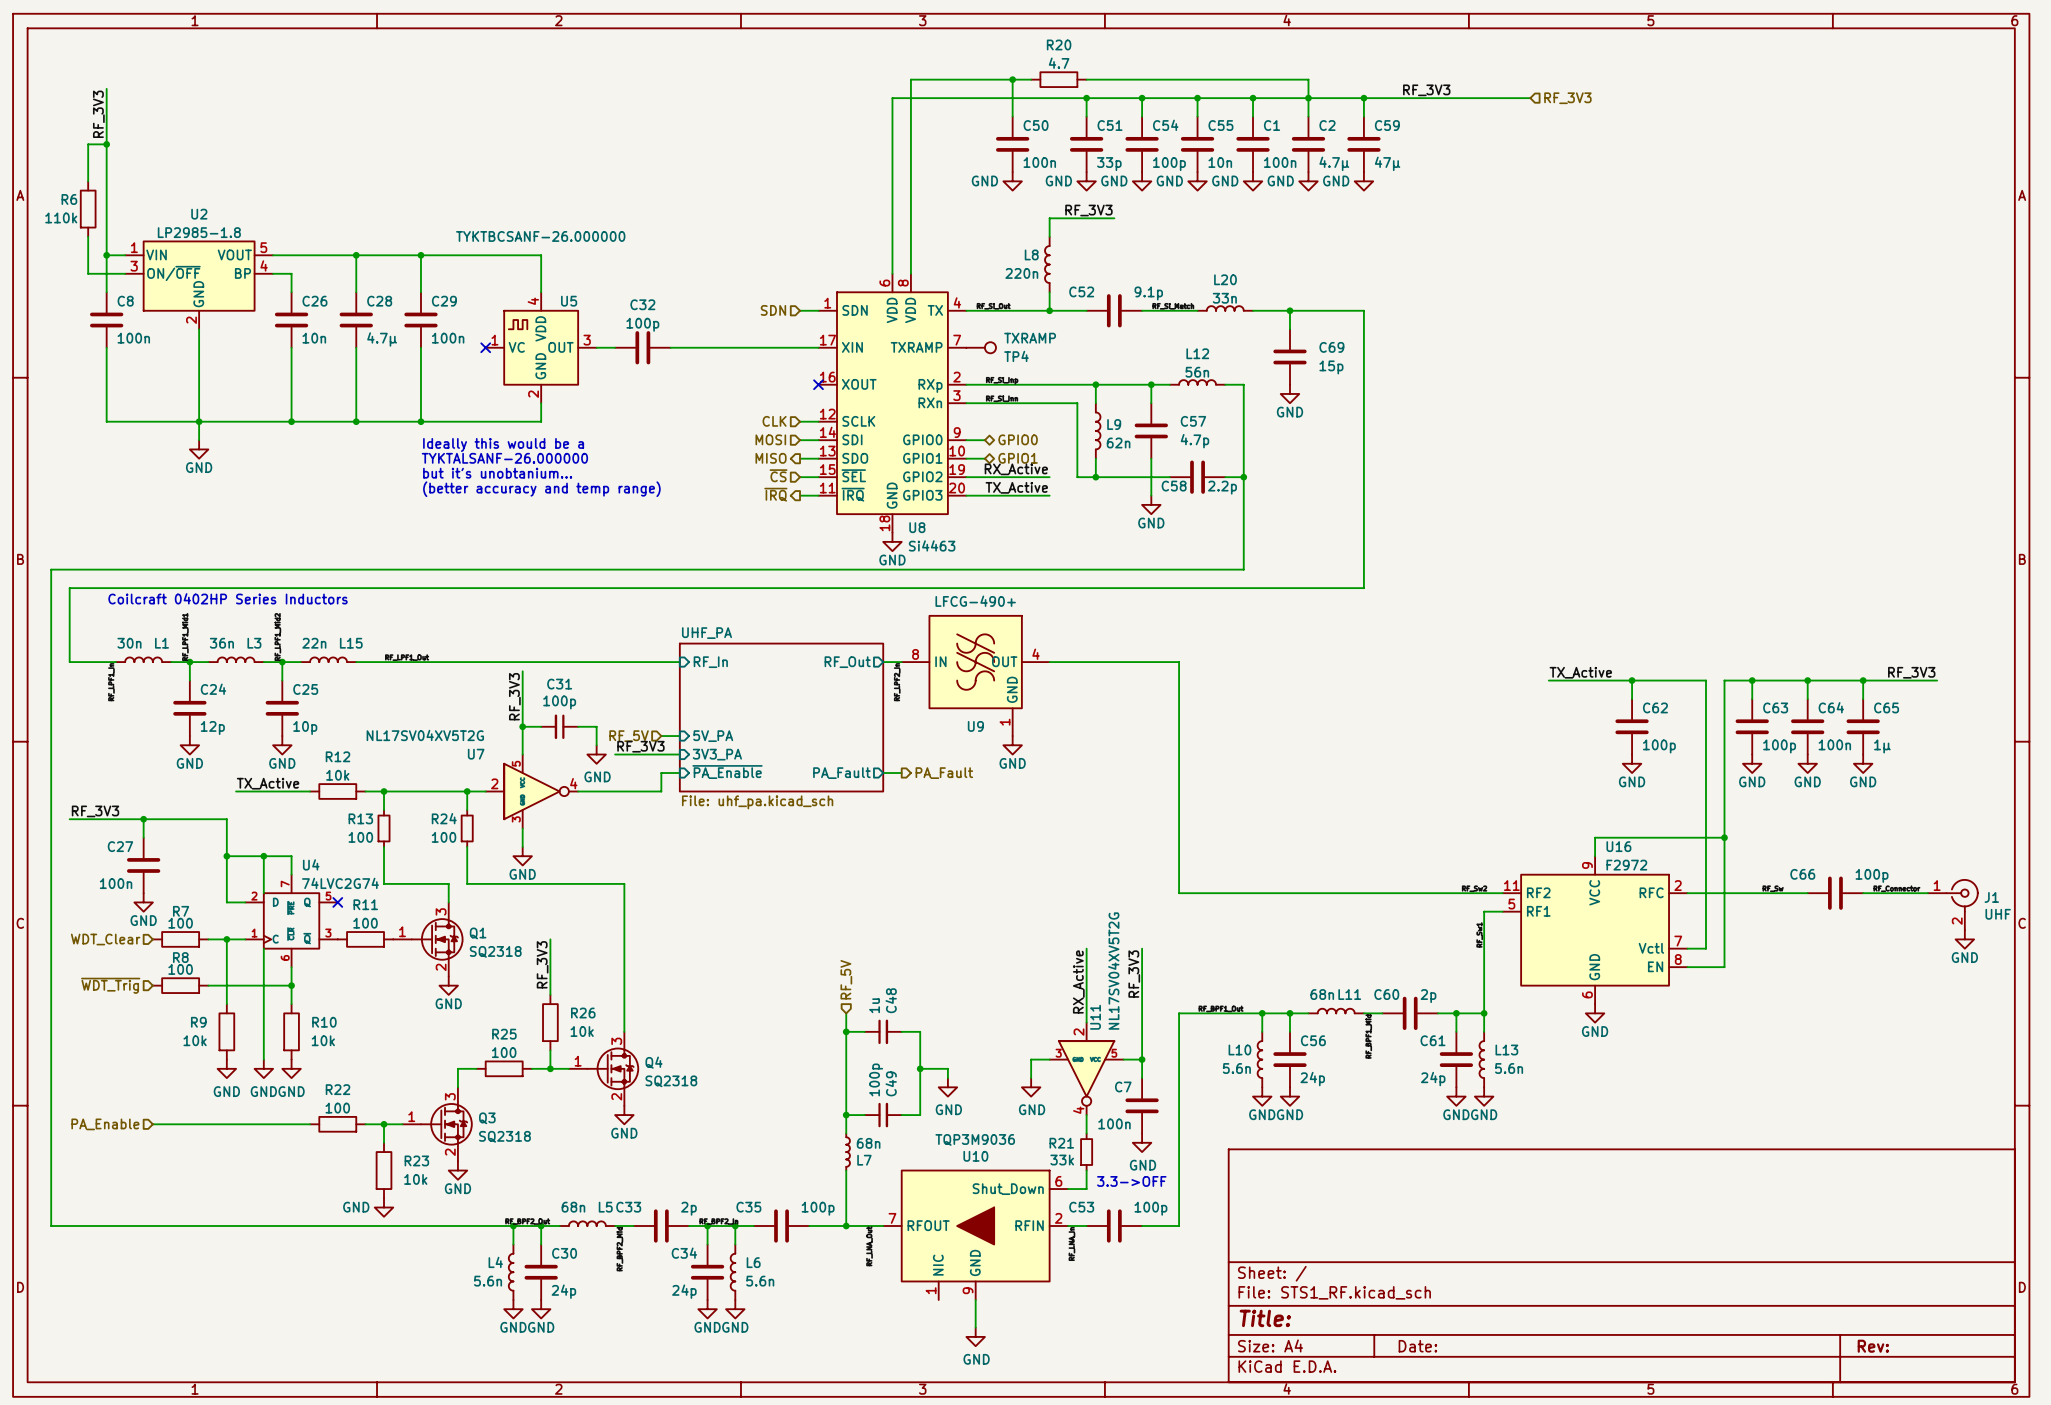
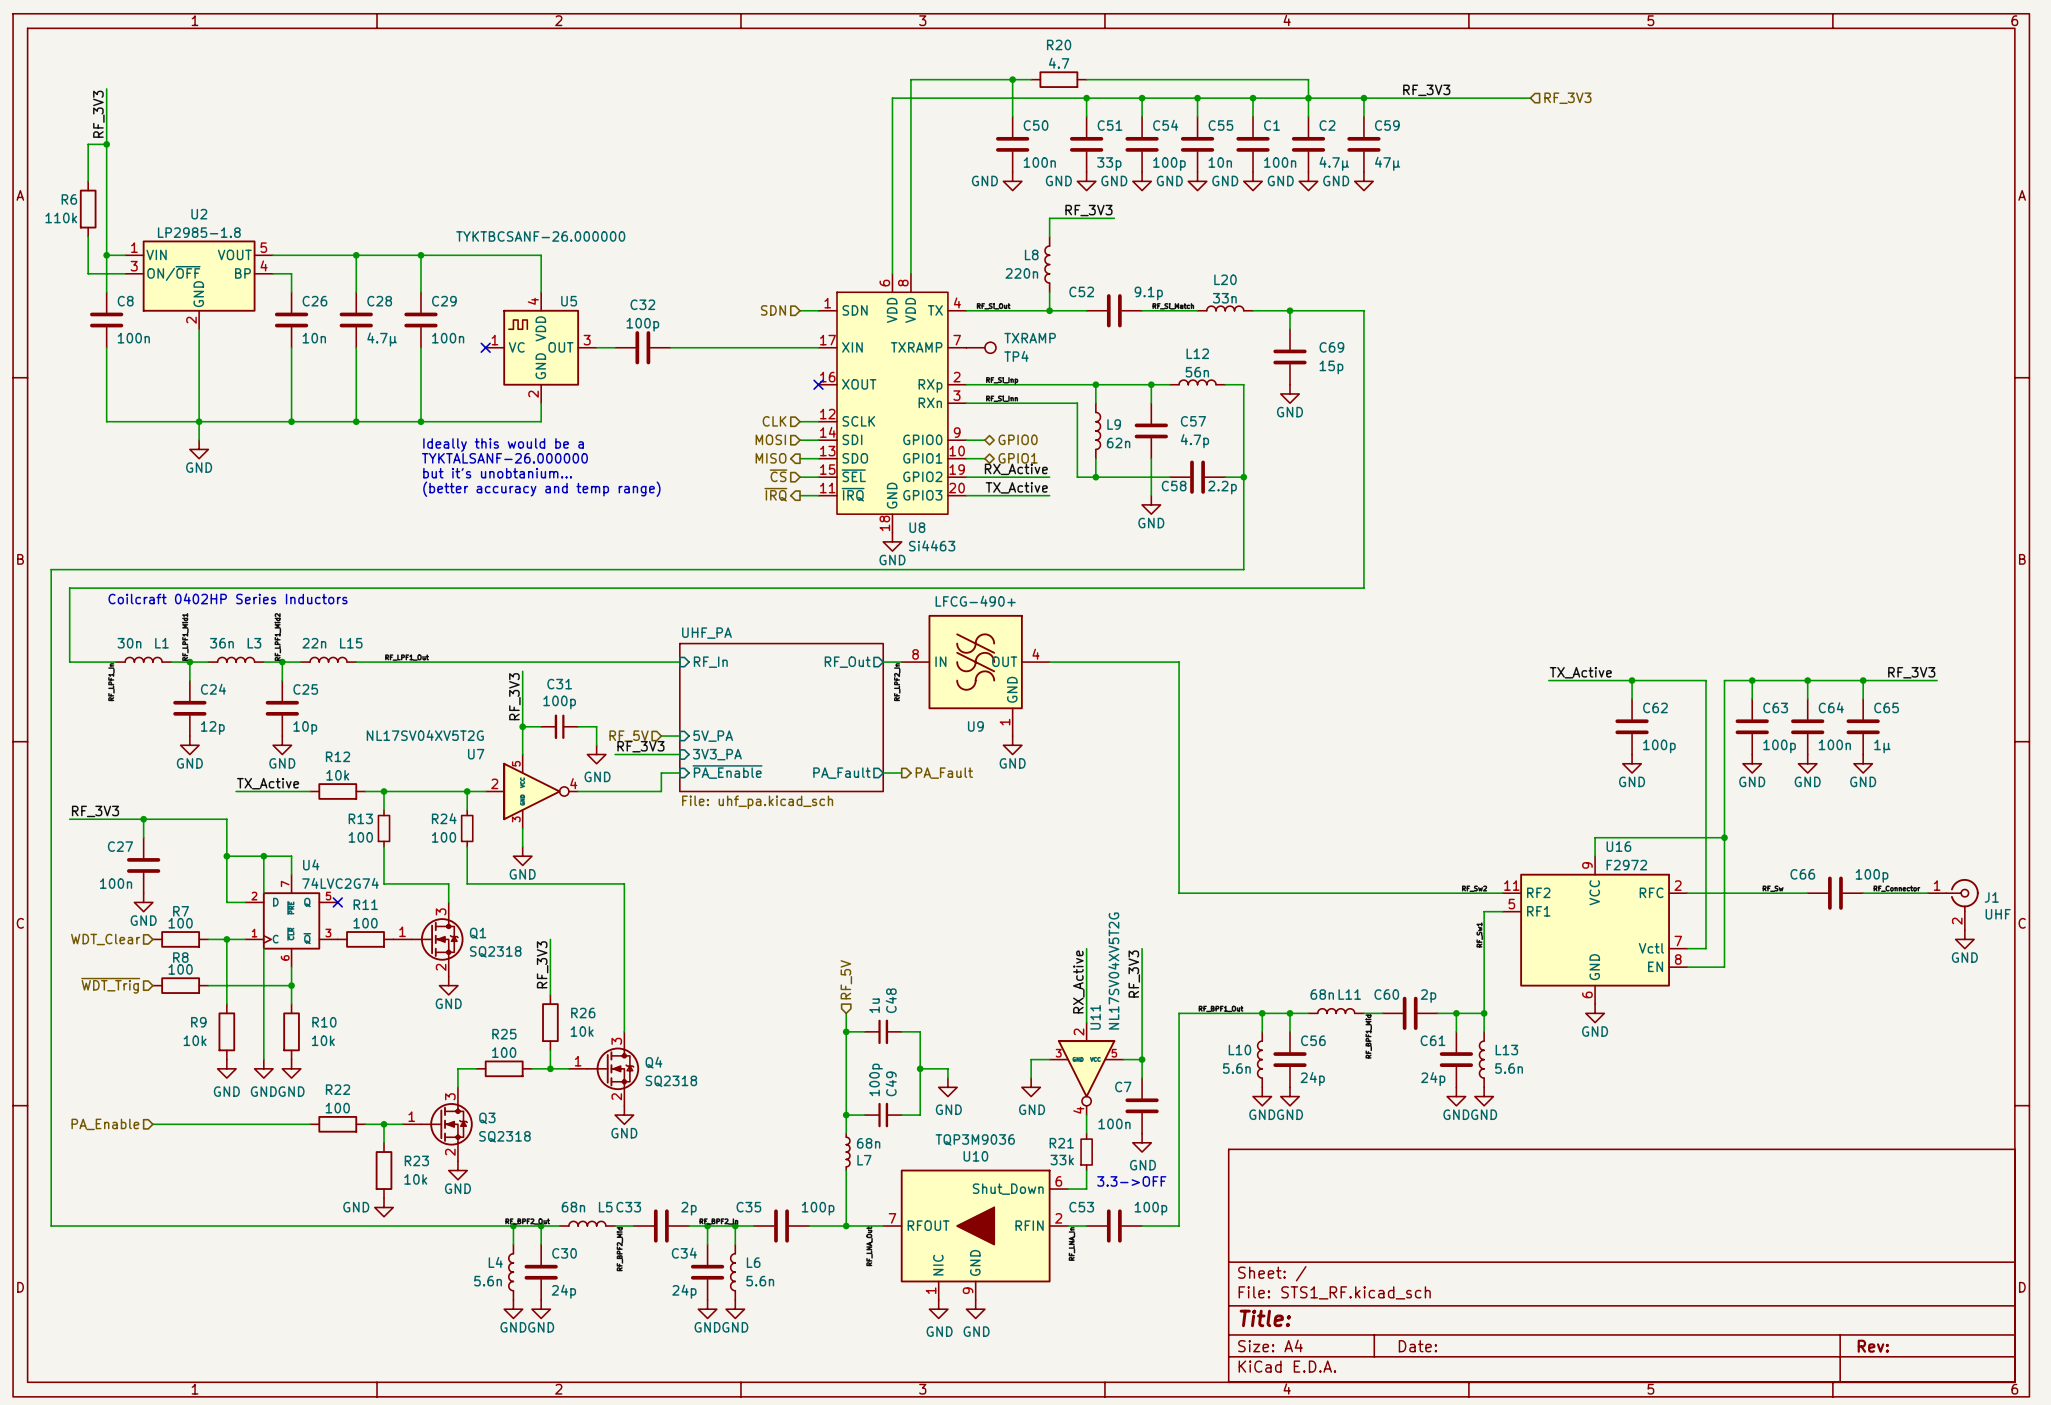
wire: (975, 1299) (975, 1327) -> none
power symbol: none -> GND (938, 1309)
power symbol: none -> GND (975, 1309)
power symbol: GND (975, 1336) -> none

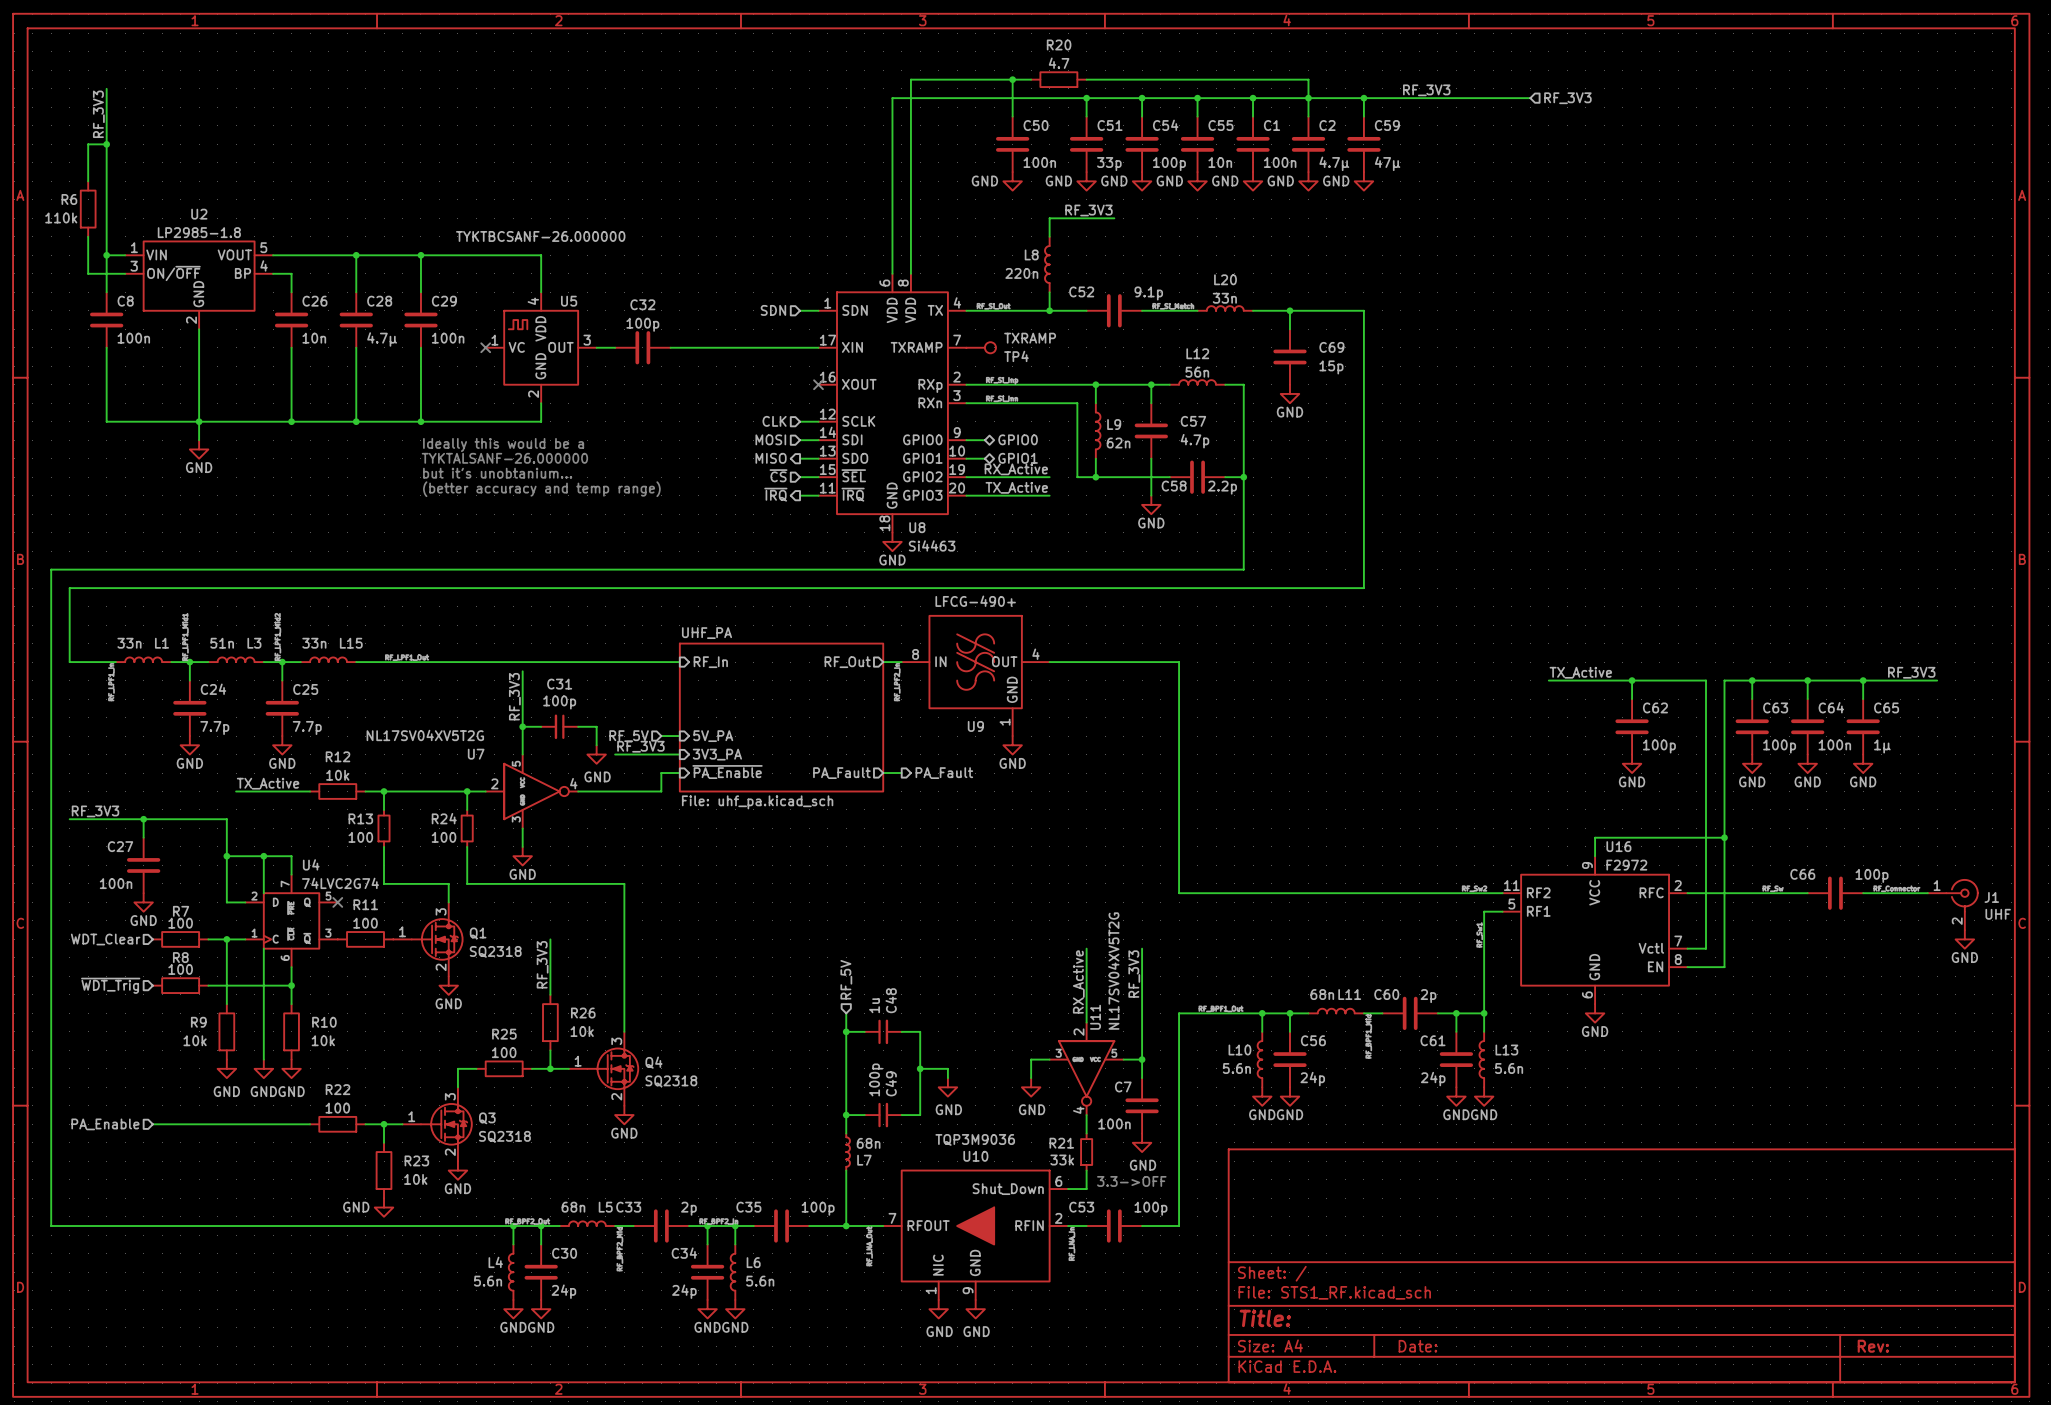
text: Coilcraft 0402HP Series Inductors (228, 598) -> none
L1 value: 30n (129, 643) -> 33n (129, 643)
L3 value: 36n (221, 643) -> 51n (222, 643)
L15 value: 22n (314, 643) -> 33n (314, 643)
C24 value: 12p (212, 727) -> 7.7p (214, 727)
C25 value: 10p (305, 727) -> 7.7p (307, 727)

